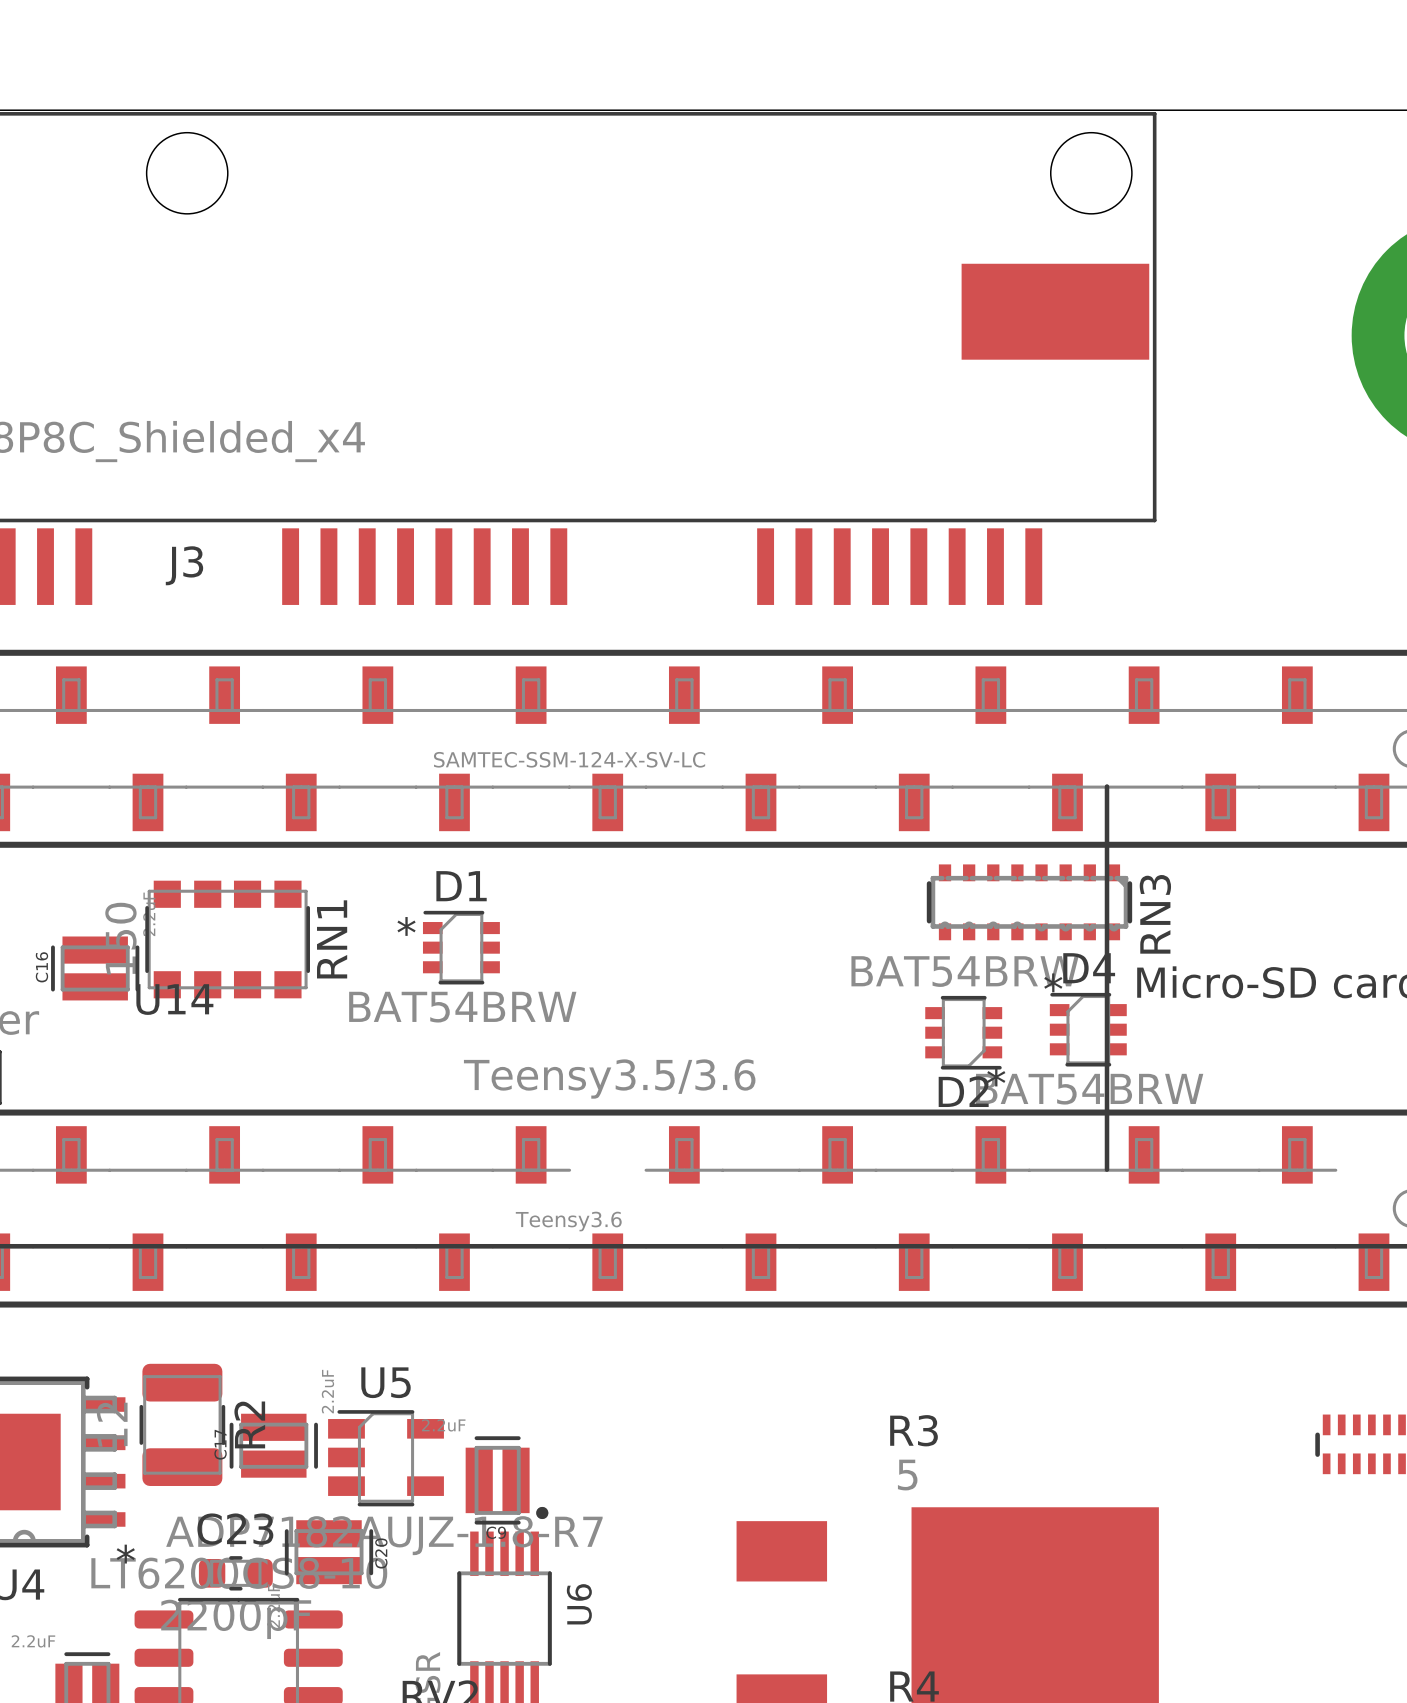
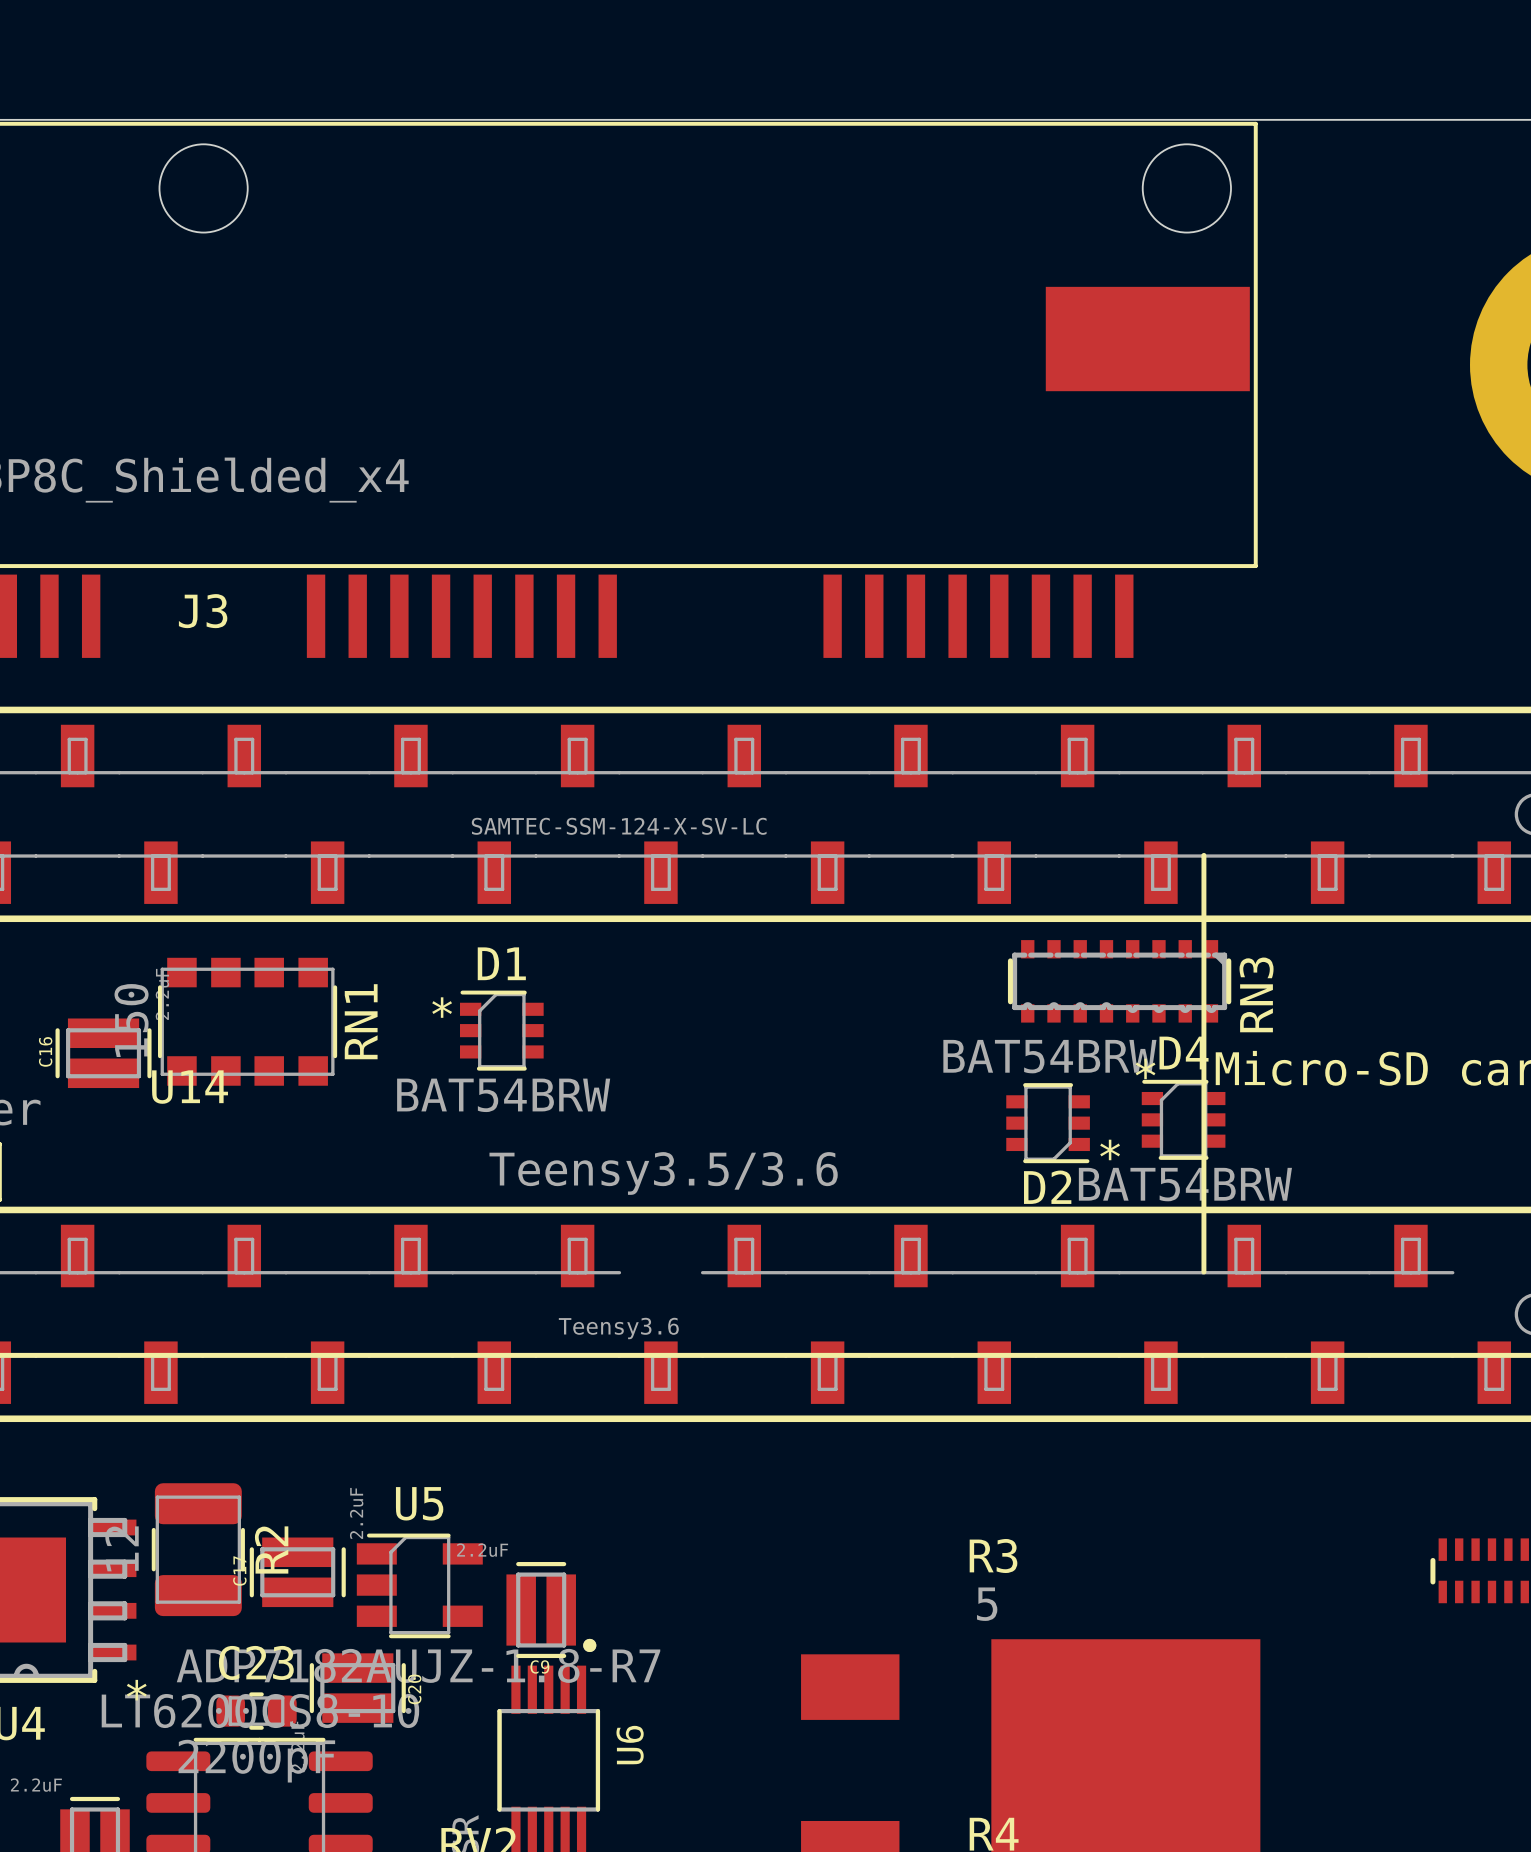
D2 text position: * (996, 1076) -> * (1110, 1149)

